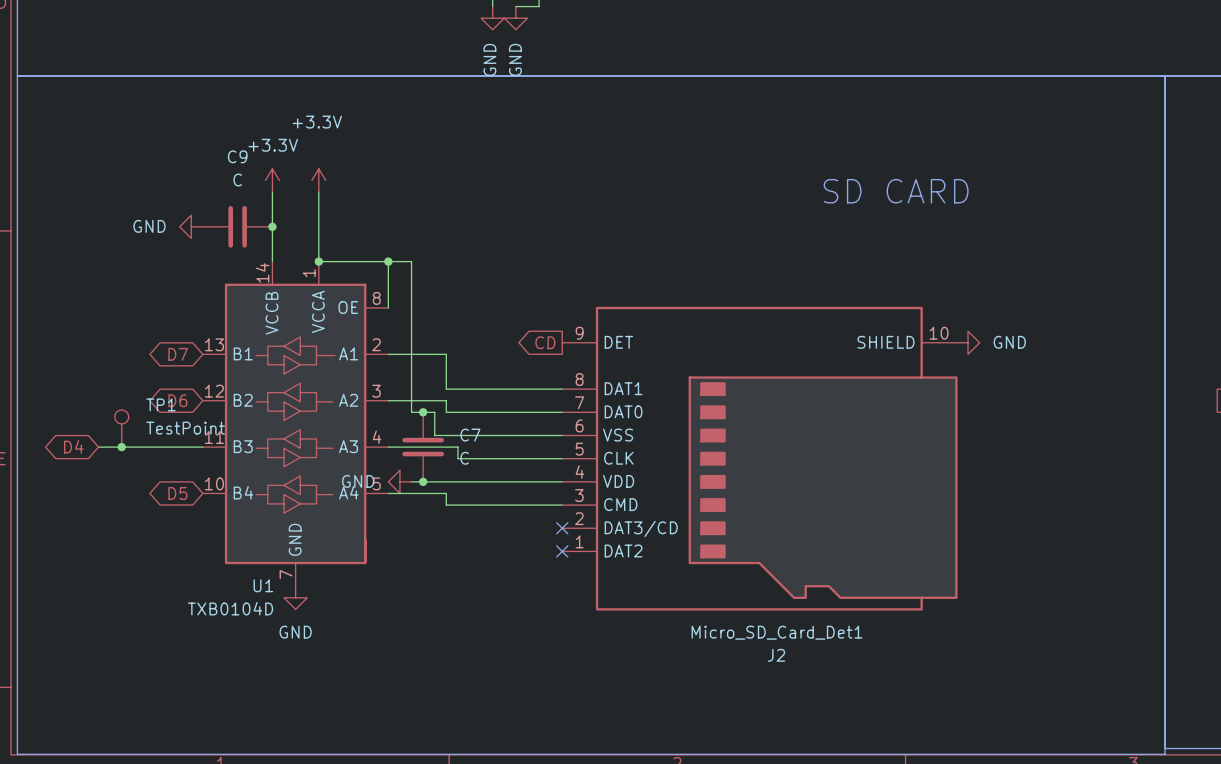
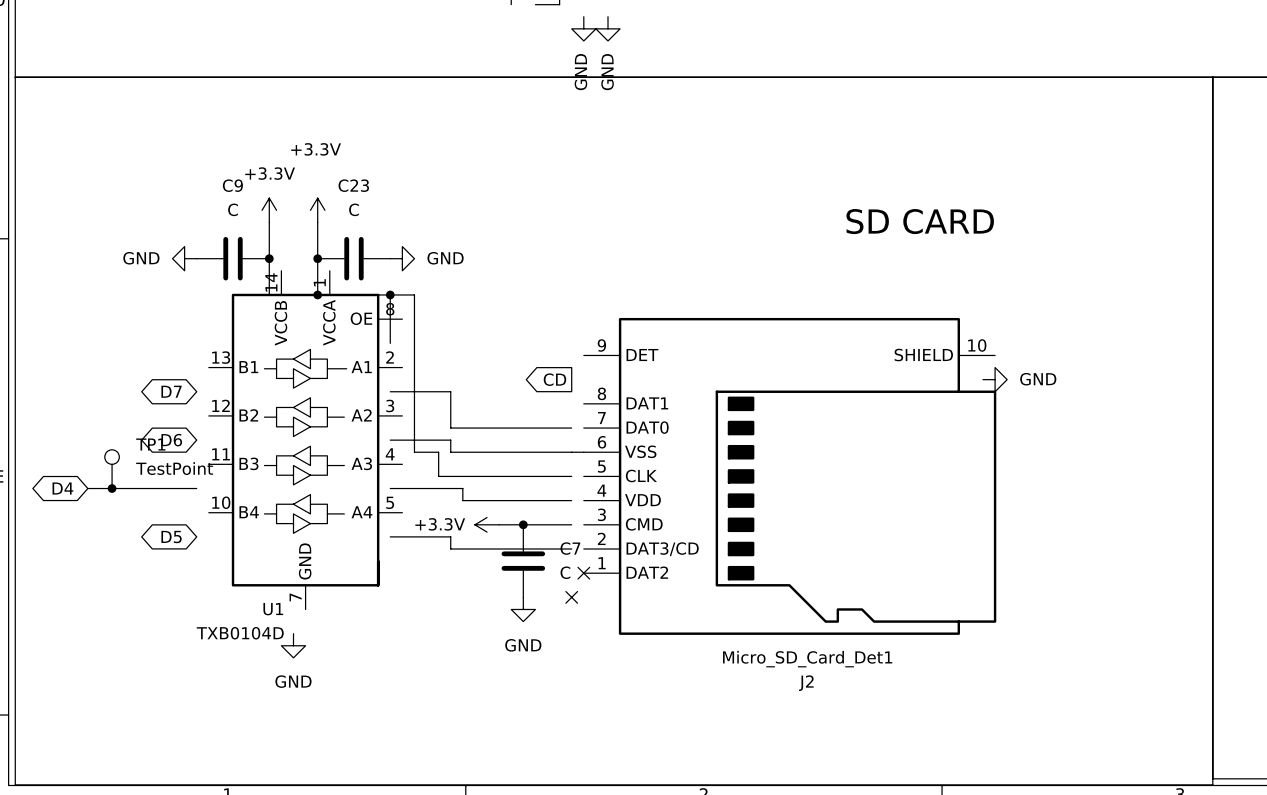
power symbol: GND (492, 18) -> none
power symbol: GND (515, 18) -> none
power symbol: none -> GND (583, 28)
power symbol: none -> GND (608, 28)
power symbol: +3.3V (272, 180) -> none
power symbol: +3.3V (318, 180) -> none
text position: SD CARD (896, 191) -> SD CARD (920, 221)
wire: (272, 192) (272, 261) -> (269, 222) (269, 294)
wire: (318, 192) (318, 261) (411, 261) (411, 412) (434, 412) (434, 423) -> (390, 440) (450, 440)
power symbol: none -> +3.3V (269, 210)
power symbol: none -> +3.3V (317, 210)
power symbol position: GND (191, 226) -> GND (184, 258)
C9 position: (237, 226) -> (233, 258)
junction: (272, 226) -> none
junction: none -> (269, 258)
junction: none -> (317, 258)
C23: none -> C (353, 258)
power symbol: none -> GND (402, 258)
junction: (318, 261) -> none
wire: (388, 261) (388, 307) -> (390, 294) (390, 343)
junction position: (388, 261) -> (390, 294)
junction: none -> (317, 294)
global label position: CD (545, 342) -> CD (554, 379)
power symbol position: GND (968, 342) -> GND (995, 379)
global label position: D7 (178, 354) -> D7 (171, 391)
wire: (388, 354) (446, 354) (446, 389) (562, 389) -> none
global label position: D6 (177, 400) -> D6 (171, 440)
wire: (388, 400) (446, 400) (446, 412) -> (390, 391) (450, 391) (450, 428) (462, 428)
junction: (423, 412) -> none
wire: (550, 412) (562, 412) -> none
TP1 position: (121, 428) -> (112, 469)
global label position: D4 (73, 446) -> D4 (62, 488)
wire: (98, 447) (202, 447) -> (87, 488) (196, 488)
junction position: (121, 447) -> (112, 488)
wire: (388, 447) (457, 447) (457, 458) -> (317, 222) (317, 294) (414, 294) (414, 452) (438, 452) (438, 476) (474, 476)
C7 position: (423, 447) -> (523, 561)
wire: (550, 458) (562, 458) -> none
power symbol: GND (399, 481) -> none
wire: (411, 481) (446, 481) -> (390, 488) (462, 488) (462, 500)
junction: (423, 481) -> none
wire: (550, 481) (562, 481) -> none
global label position: D5 (177, 493) -> D5 (171, 537)
wire: (388, 493) (446, 493) (446, 505) (481, 505) -> none
power symbol: none -> +3.3V (487, 524)
junction: none -> (523, 524)
wire: (550, 505) (562, 505) -> none
wire: none -> (390, 536) (450, 536) (450, 549) (571, 549)
no-connect mark position: (562, 528) -> (571, 597)
power symbol: none -> GND (523, 609)
power symbol position: GND (295, 597) -> GND (293, 645)

